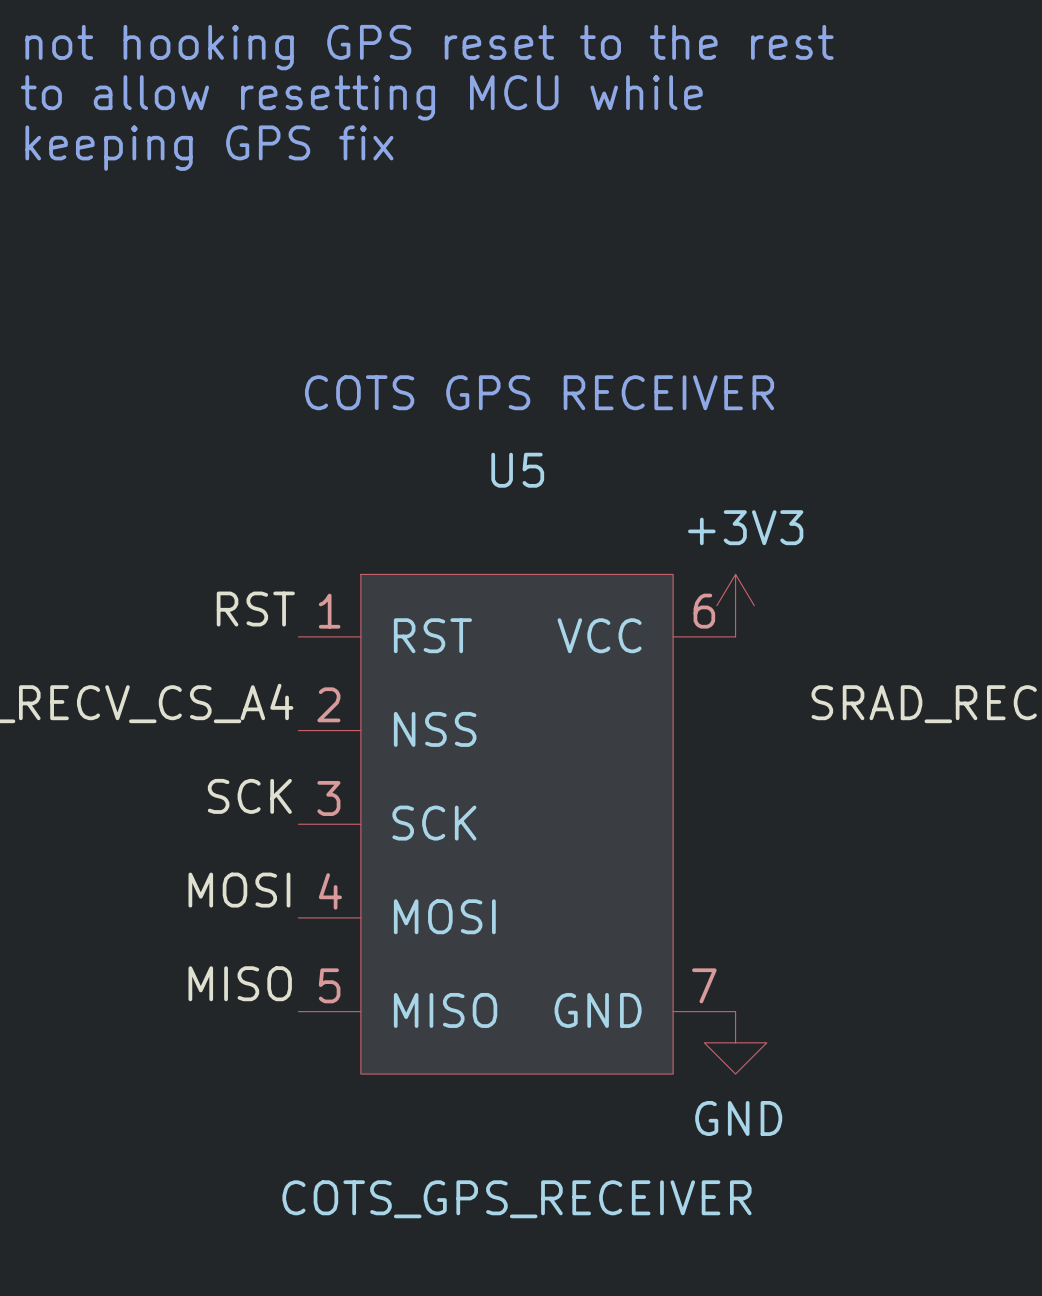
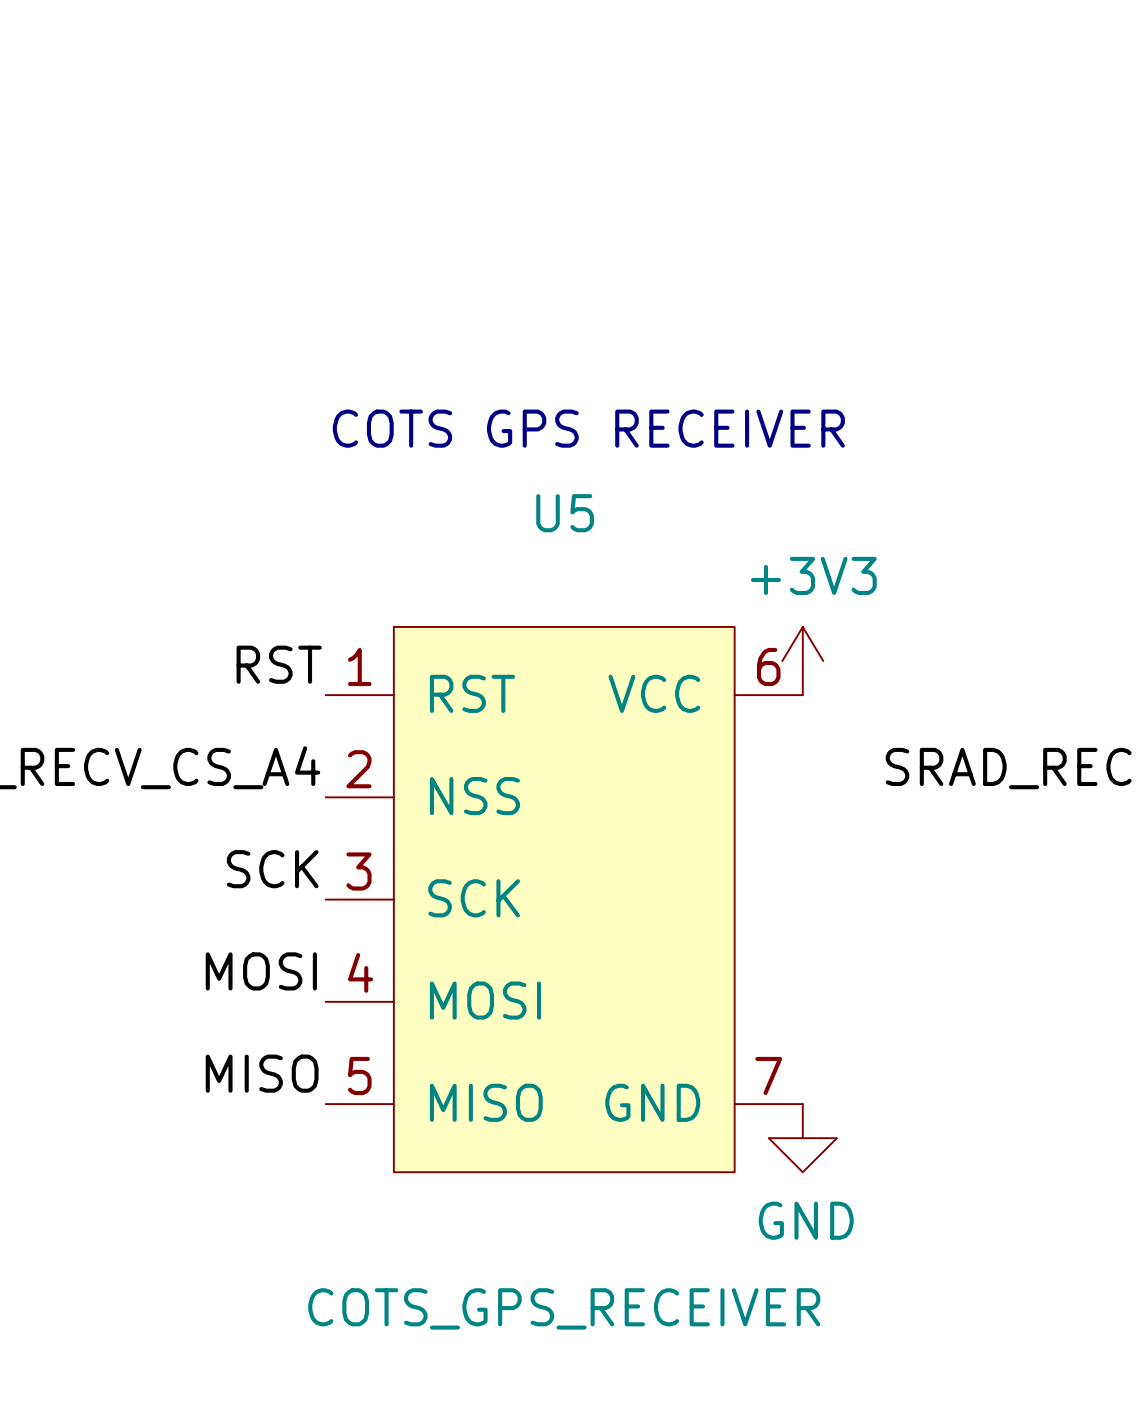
text: not hooking GPS reset to the rest (429, 47) -> none
text: to allow resetting MCU while (361, 97) -> none
text: keeping GPS fix (209, 148) -> none

